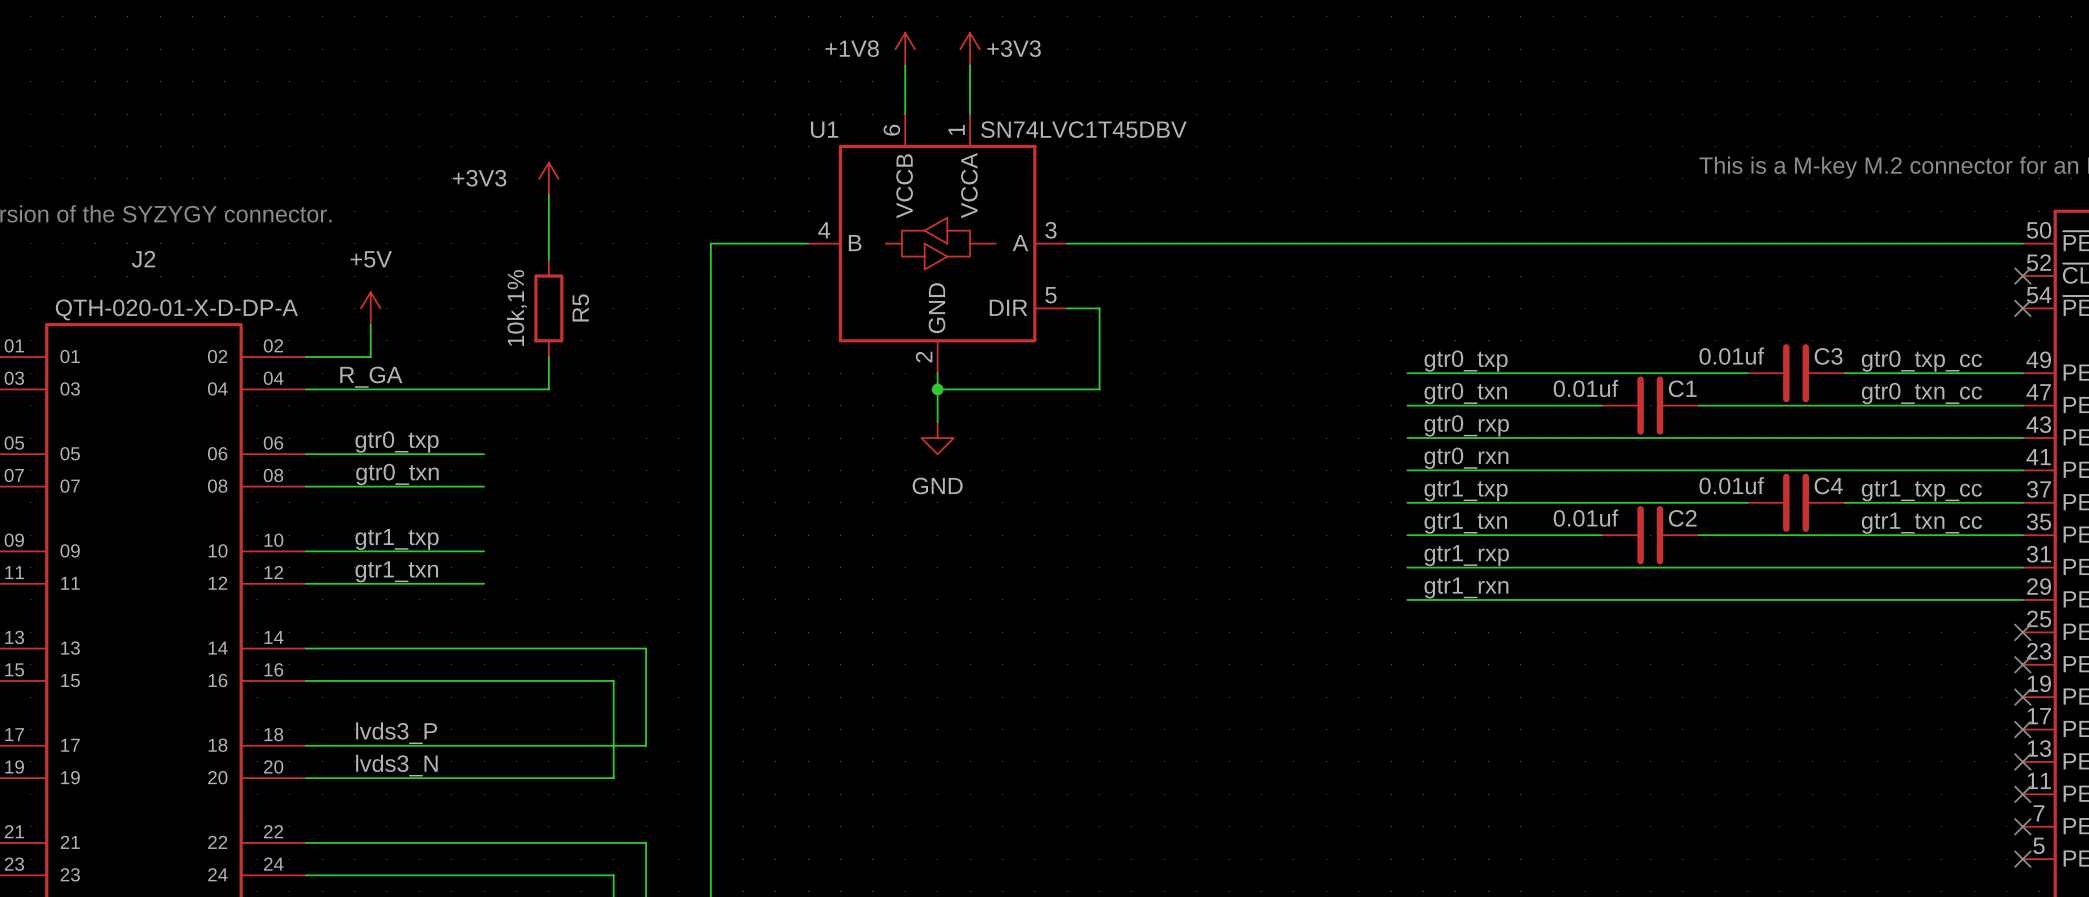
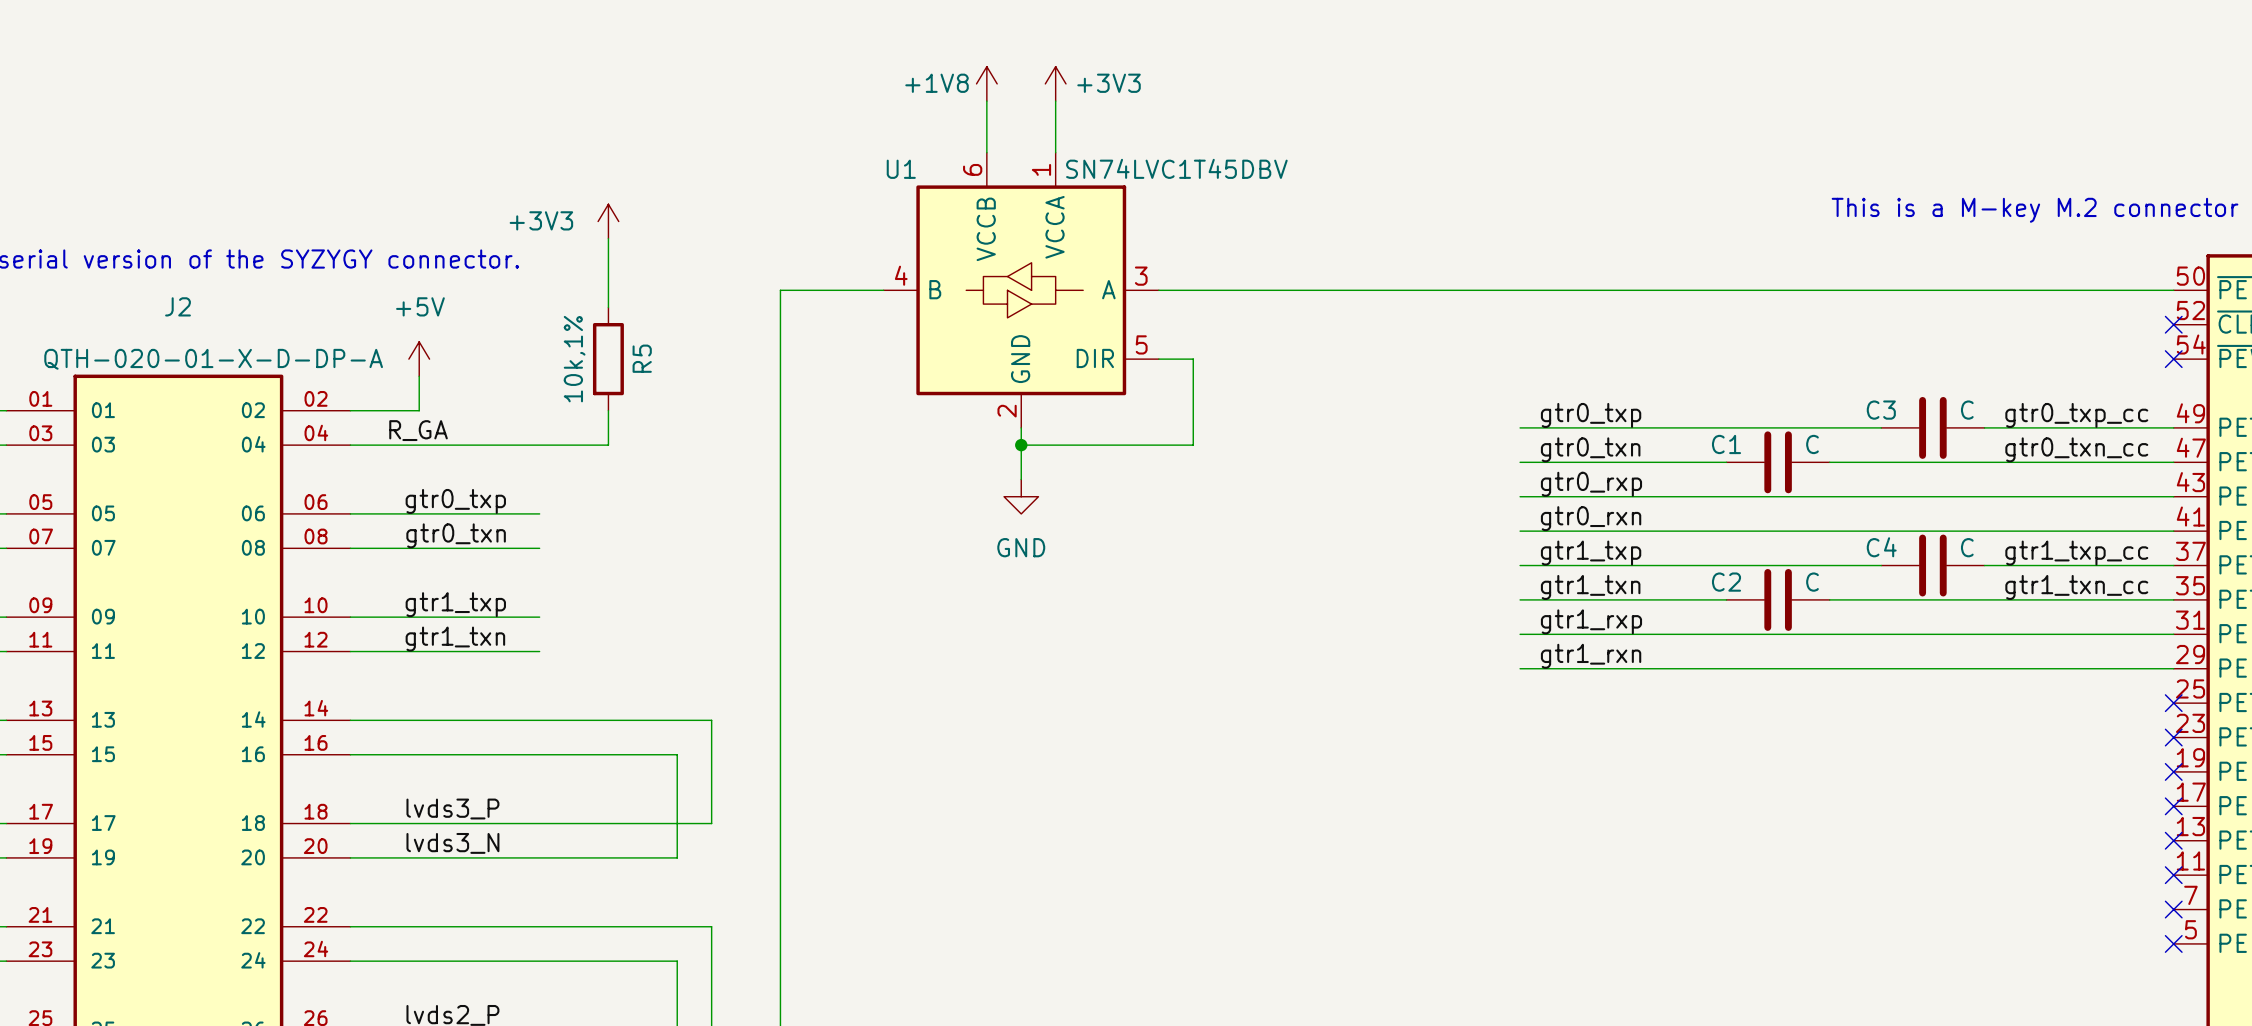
C3 value: 0.01uf (1731, 356) -> C (1967, 410)
C3 name position: C3 (1828, 356) -> C3 (1881, 410)
C1 value: 0.01uf (1585, 388) -> C (1812, 444)
C1 name position: C1 (1682, 388) -> C1 (1726, 444)
C4 value: 0.01uf (1731, 485) -> C (1967, 547)
C4 name position: C4 (1828, 485) -> C4 (1881, 547)
C2 value: 0.01uf (1585, 518) -> C (1812, 582)
C2 name position: C2 (1682, 518) -> C2 (1726, 582)

